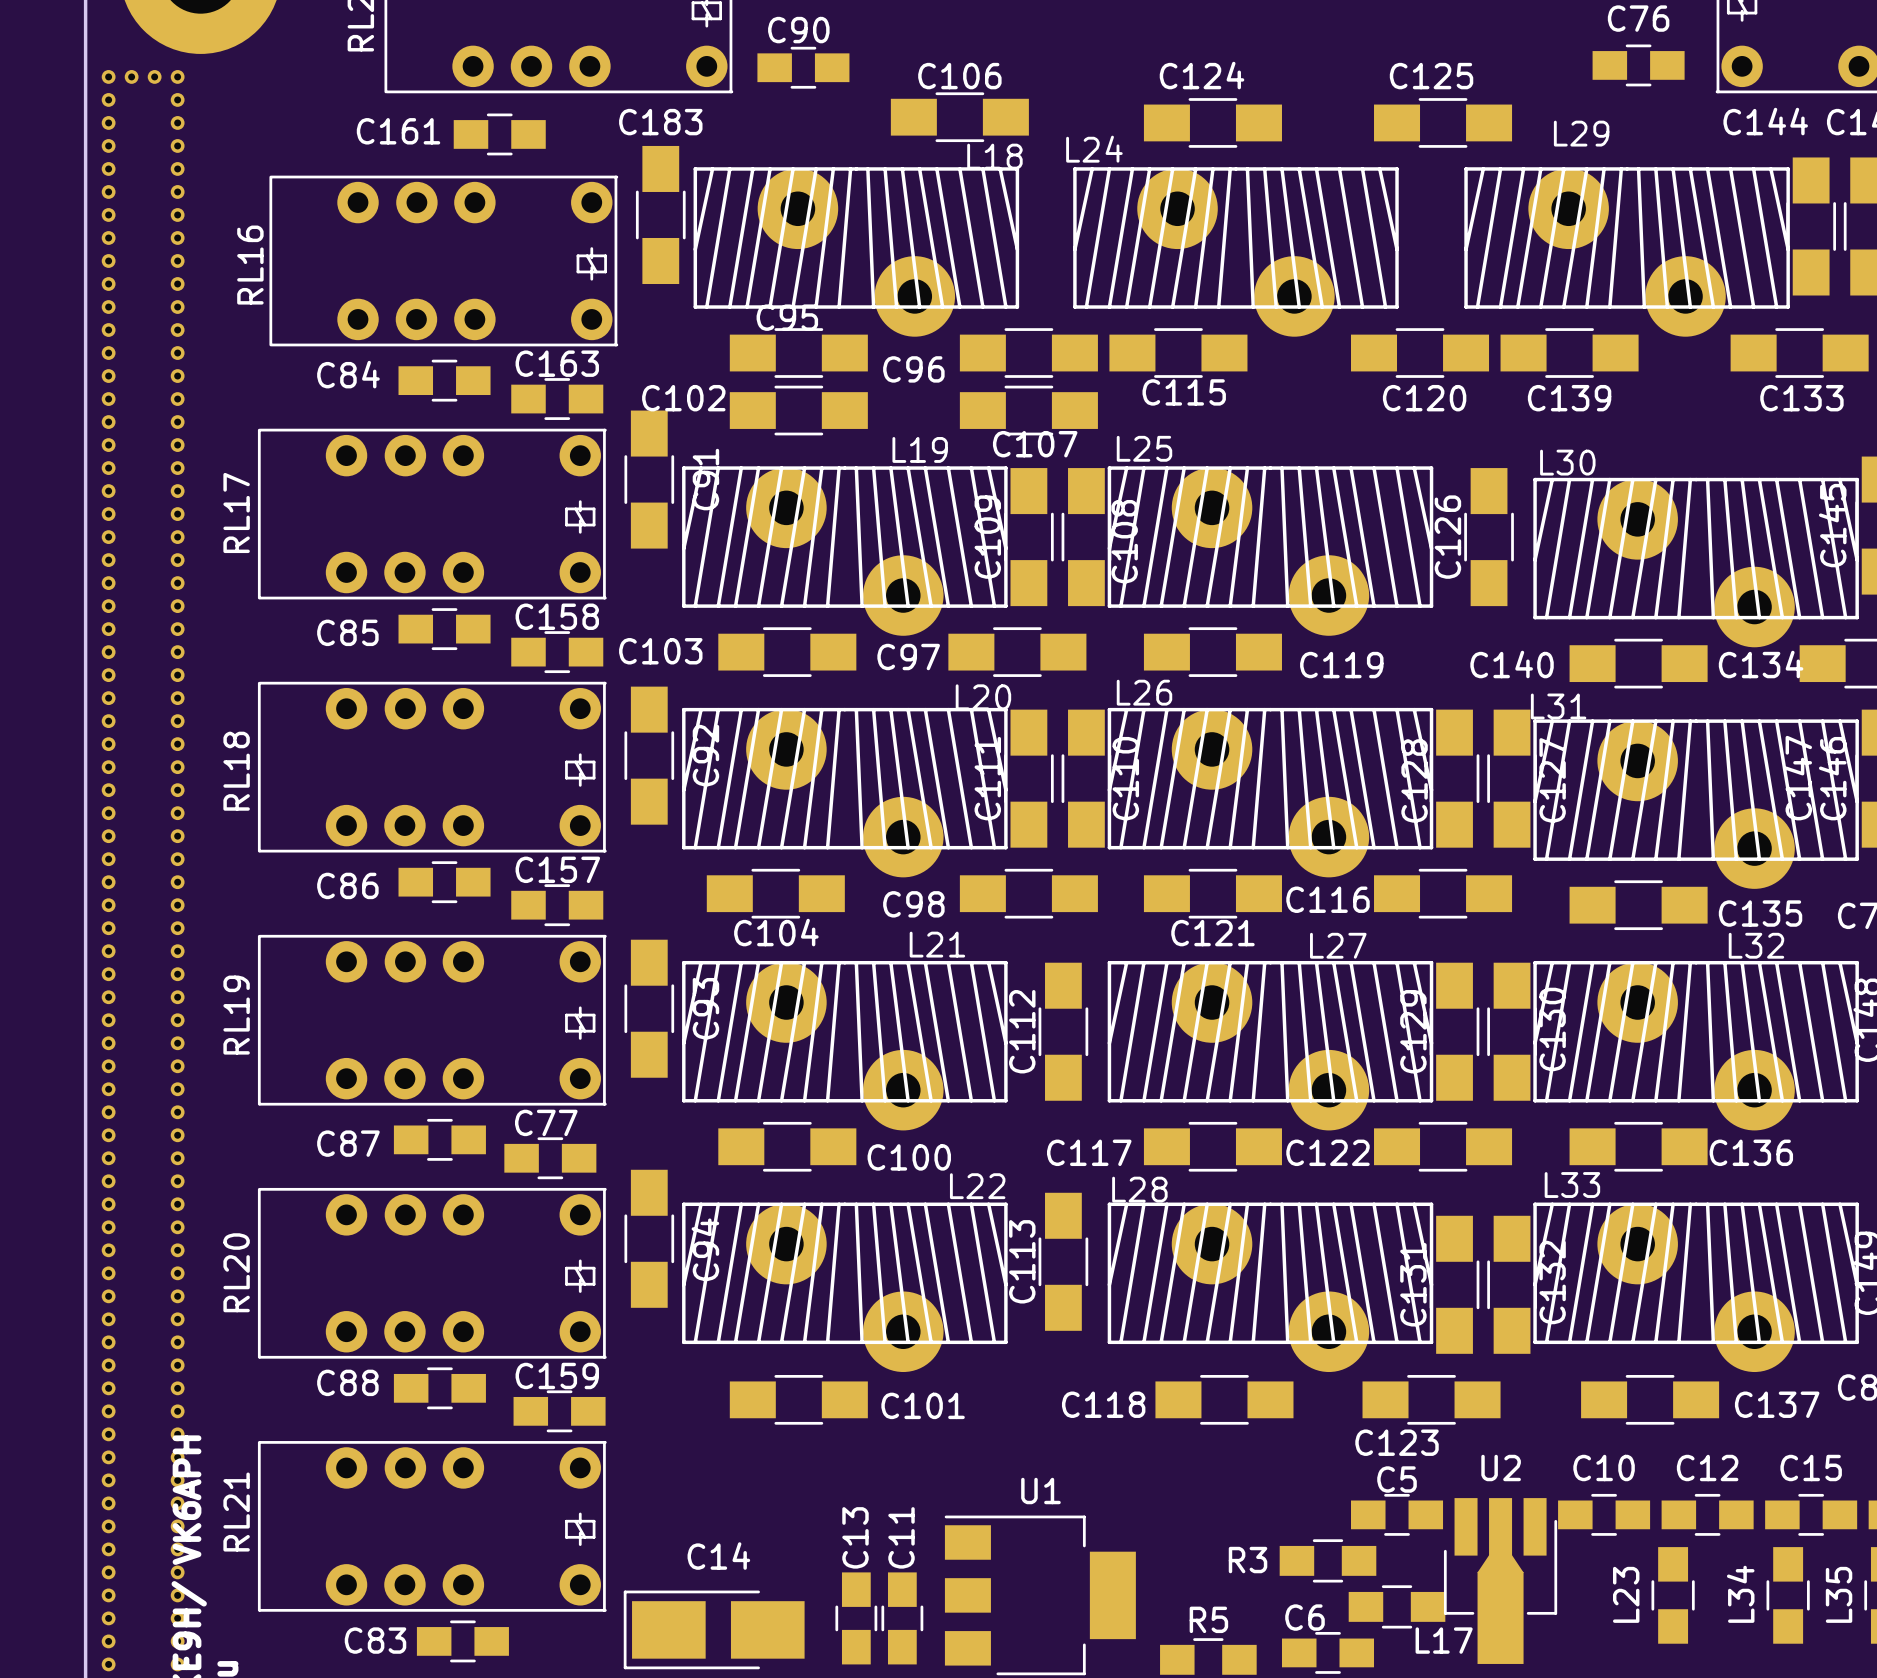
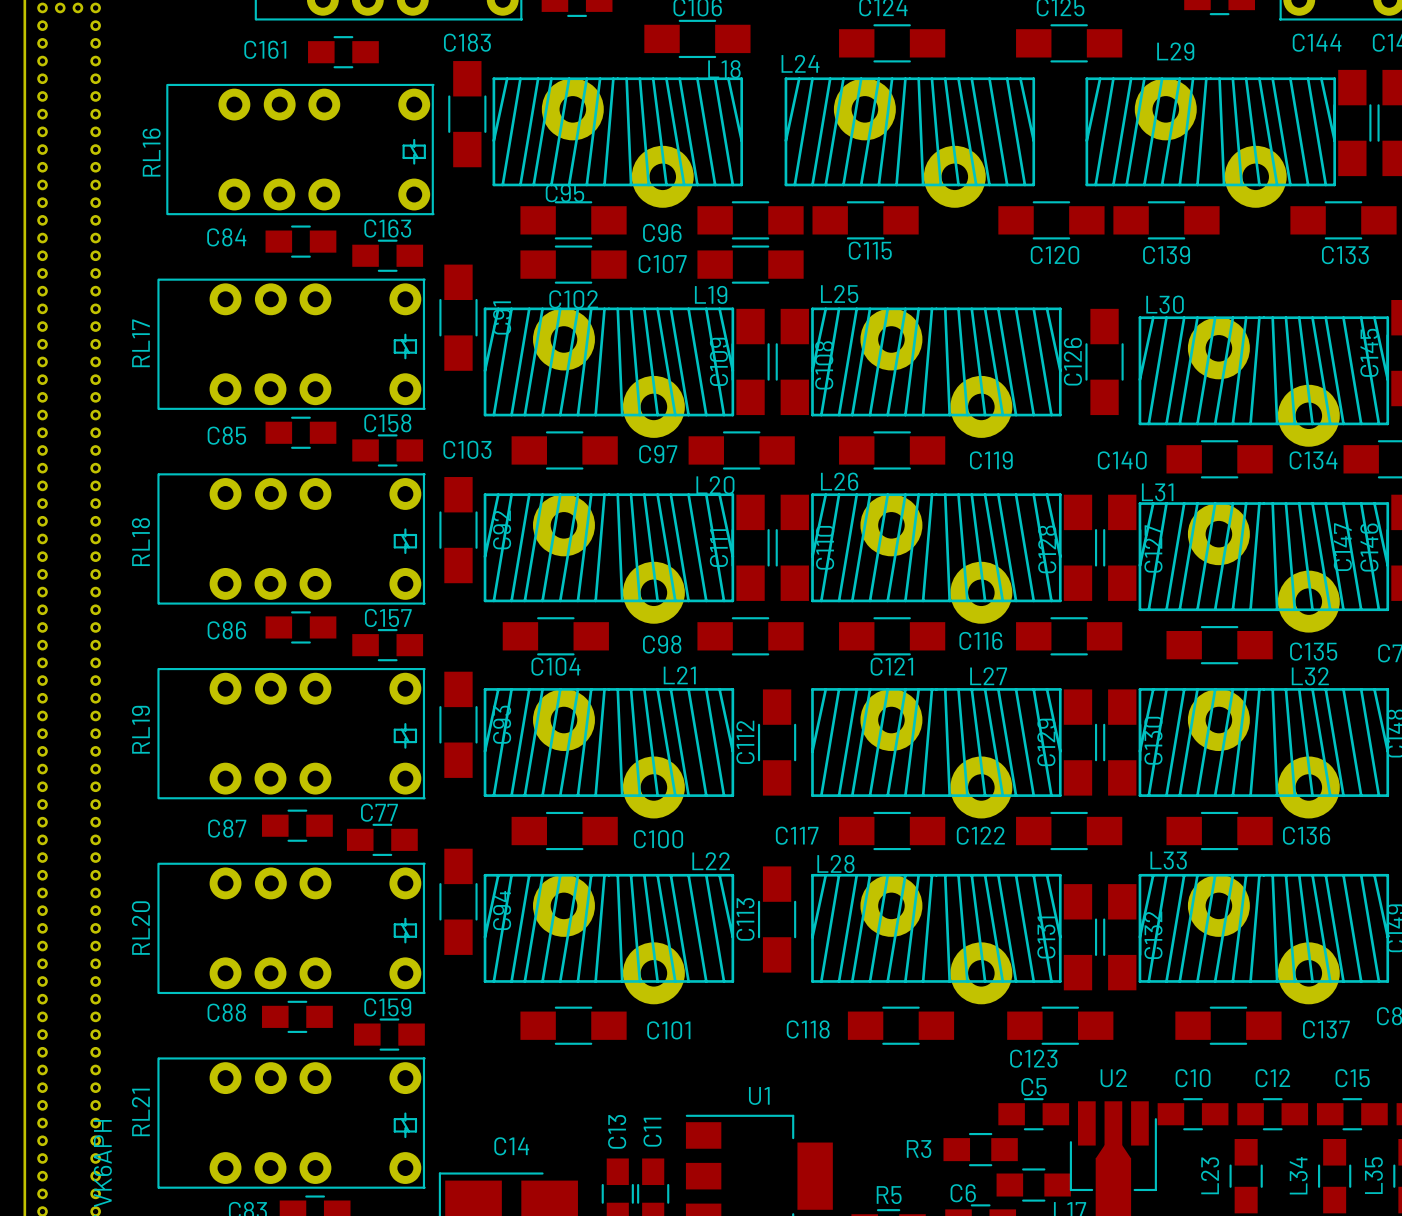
C102 name position: C102 (683, 398) -> C102 (573, 299)
C107 name position: C107 (1035, 444) -> C107 (662, 263)
L19 name position: L19 (920, 449) -> L19 (711, 294)

